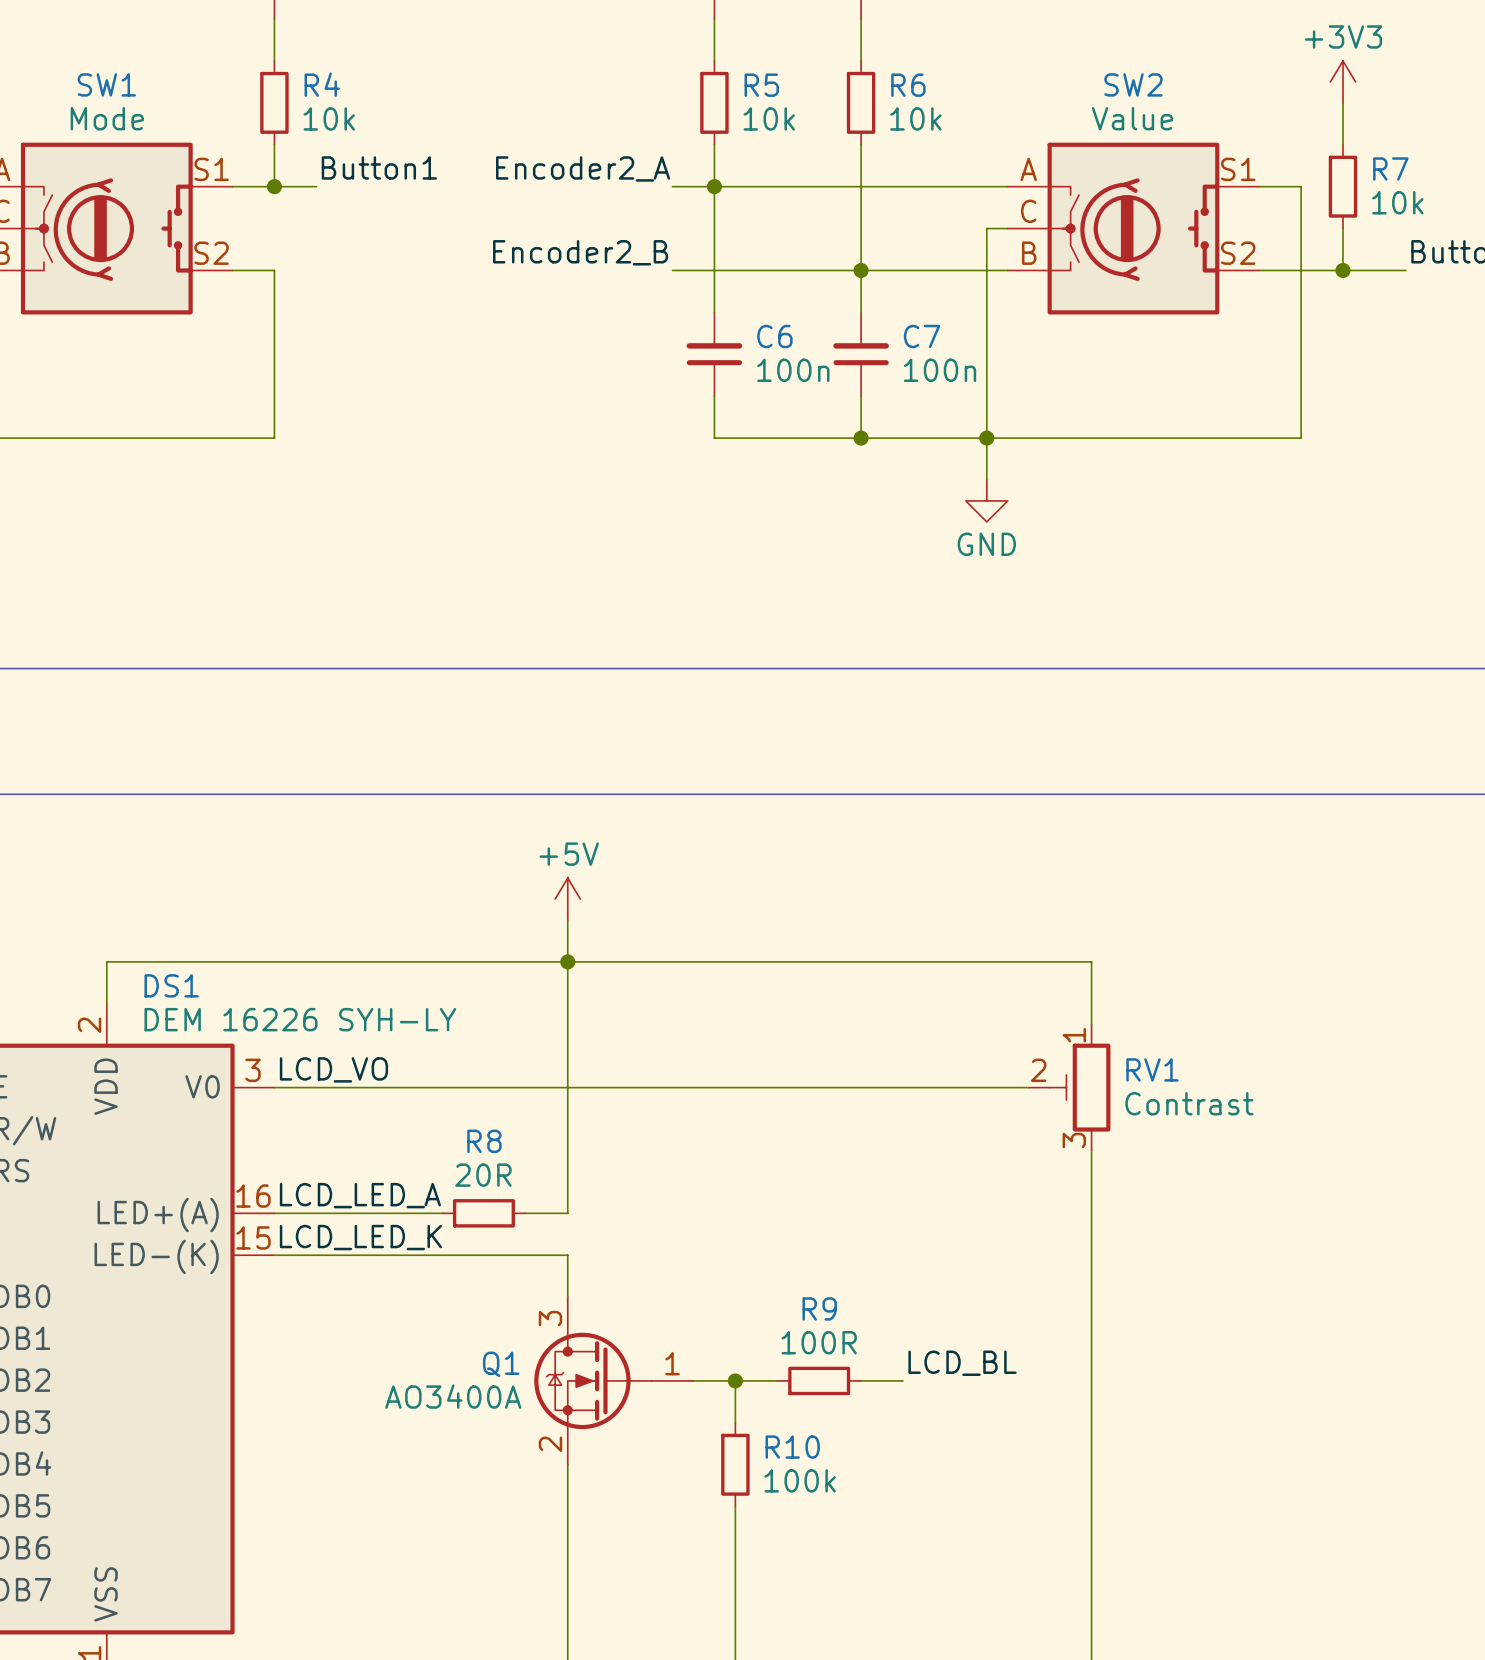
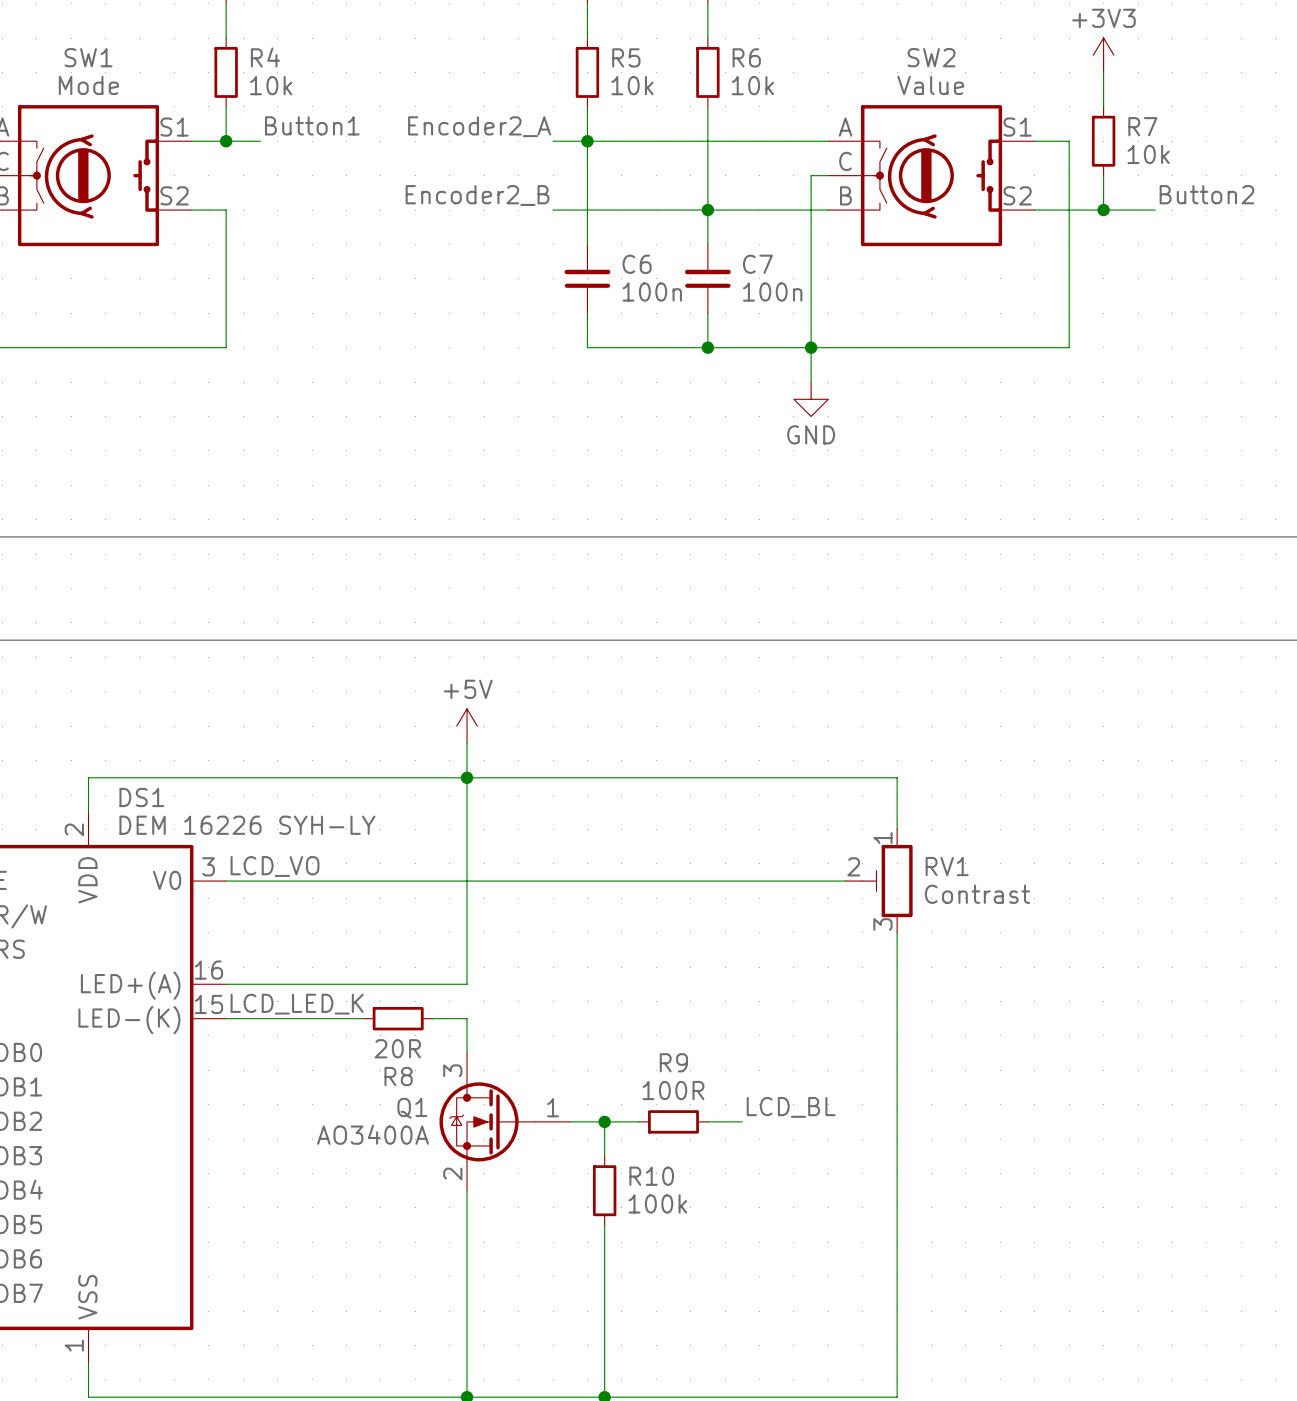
R8 name position: R8 (484, 1141) -> R8 (398, 1076)
R8 value position: 20R (483, 1175) -> 20R (397, 1048)
label: LCD_LED_A (360, 1195) -> none
R8 position: (483, 1213) -> (398, 1018)
wire: (442, 1255) (525, 1255) -> (363, 984) (432, 984)

